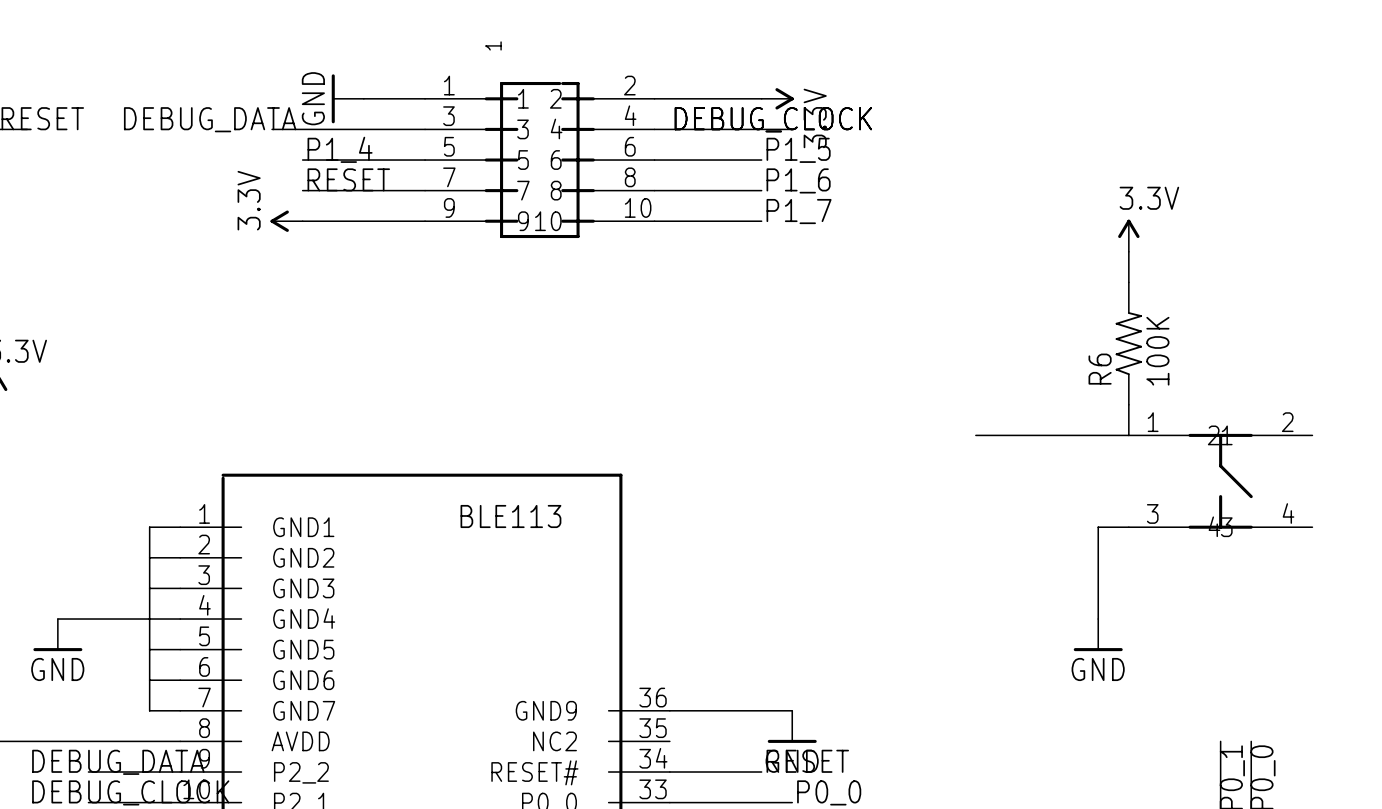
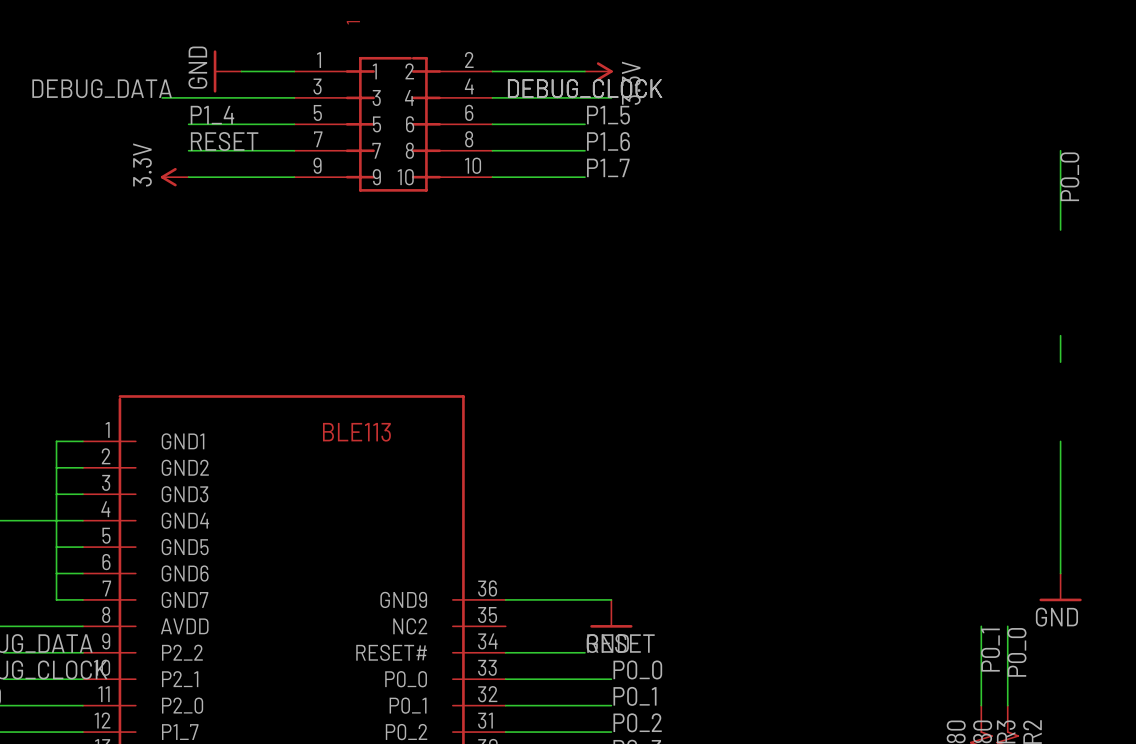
wire: none -> (1060, 150) (1060, 230)
label: none -> P0_0 (1069, 176)
power symbol: 3.3V (1128, 235) -> none
wire: (1128, 251) (1128, 282) -> (1060, 335) (1060, 362)
R6: 100K (1128, 343) -> none
wire: (1128, 404) (1128, 435) (975, 435) -> none
part: (1220, 481) -> none
wire: (1128, 527) (1098, 527) (1098, 619) -> none
wire: none -> (1060, 441) (1060, 573)
power symbol position: GND (1098, 635) -> GND (1060, 587)

